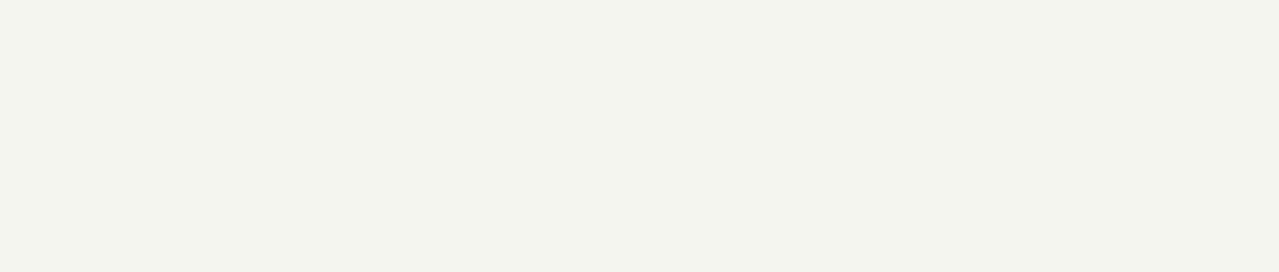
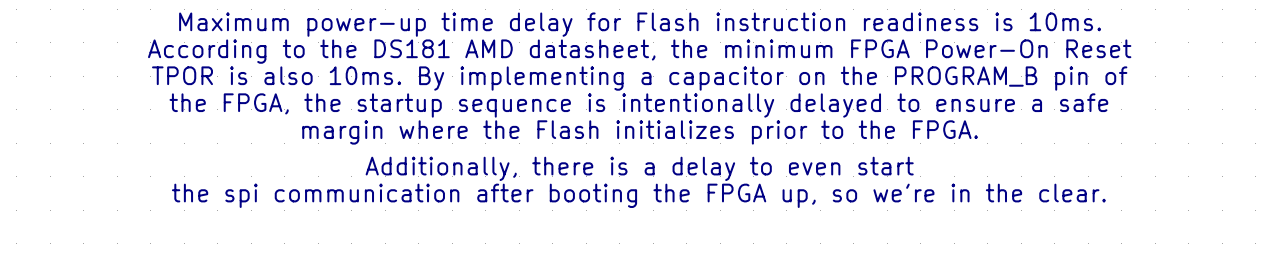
text: none -> Maximum power-up time delay for Flash instruction readiness is 10ms. (640, 24)
text: none -> According to the DS181 AMD datasheet, the minimum FPGA Power-On Reset (639, 51)
text: none -> TPOR is also 10ms. By implementing a capacitor on the PROGRAM_B pin of (639, 78)
text: none -> the FPGA, the startup sequence is intentionally delayed to ensure a safe (638, 105)
text: none -> margin where the Flash initializes prior to the FPGA. (640, 132)
text: none -> Additionally, there is a delay to even start (639, 168)
text: none -> the spi communication after booting the FPGA up, so we're in the clear. (638, 195)

